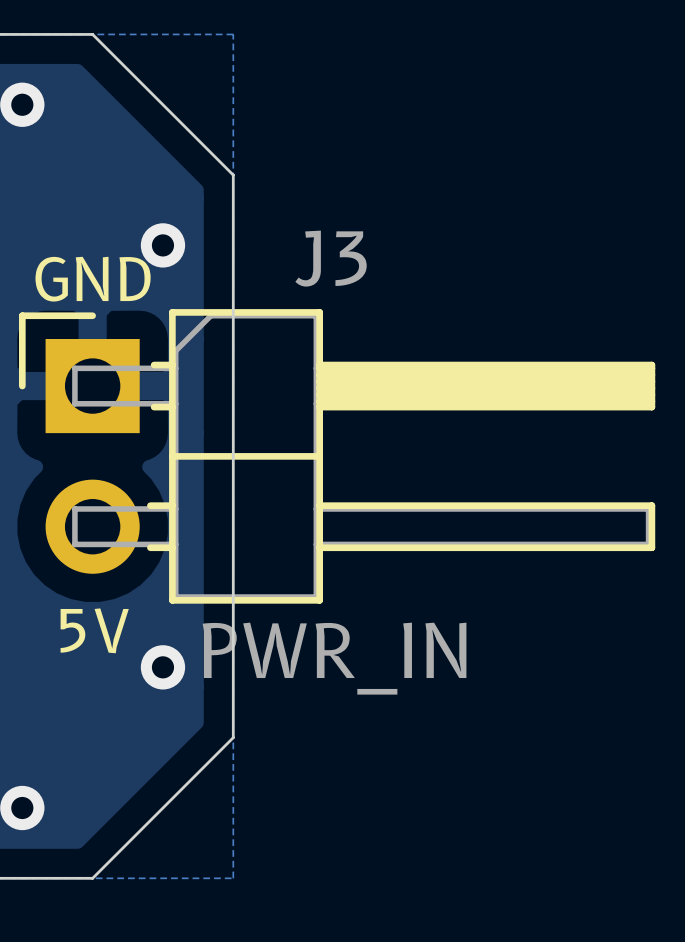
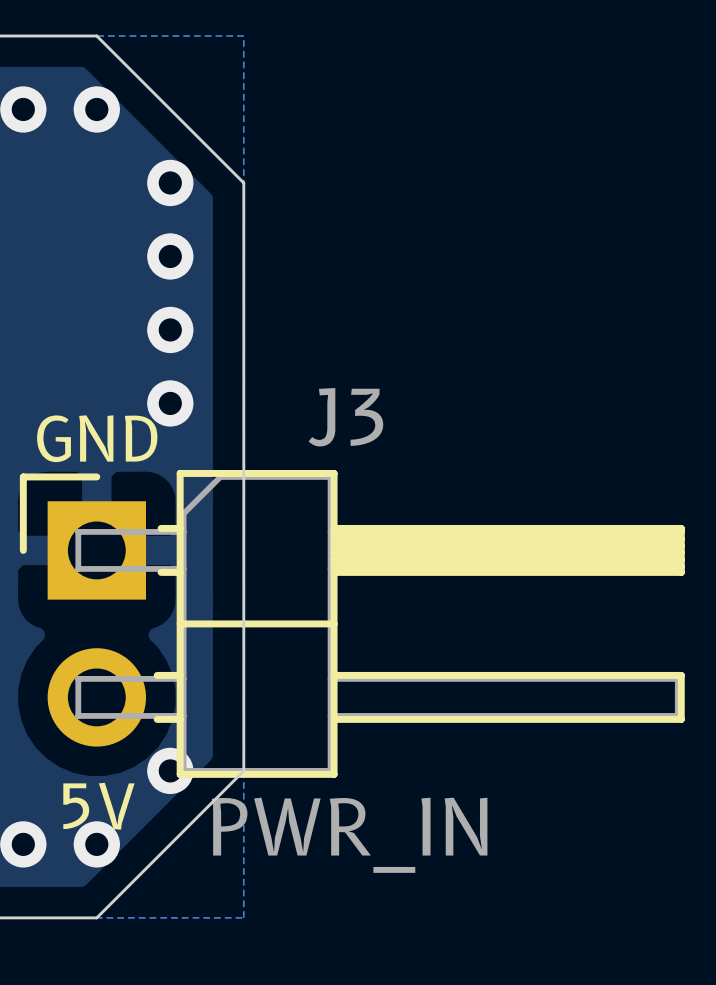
via: none -> (96, 109)
via: none -> (170, 182)
text position: GND (93, 279) -> GND (97, 438)
via: none -> (170, 329)
via: none -> (170, 403)
J3 position: (337, 456) -> (352, 623)
text position: 5V (94, 630) -> 5V (98, 806)
via position: (162, 667) -> (170, 770)
via: none -> (96, 844)

